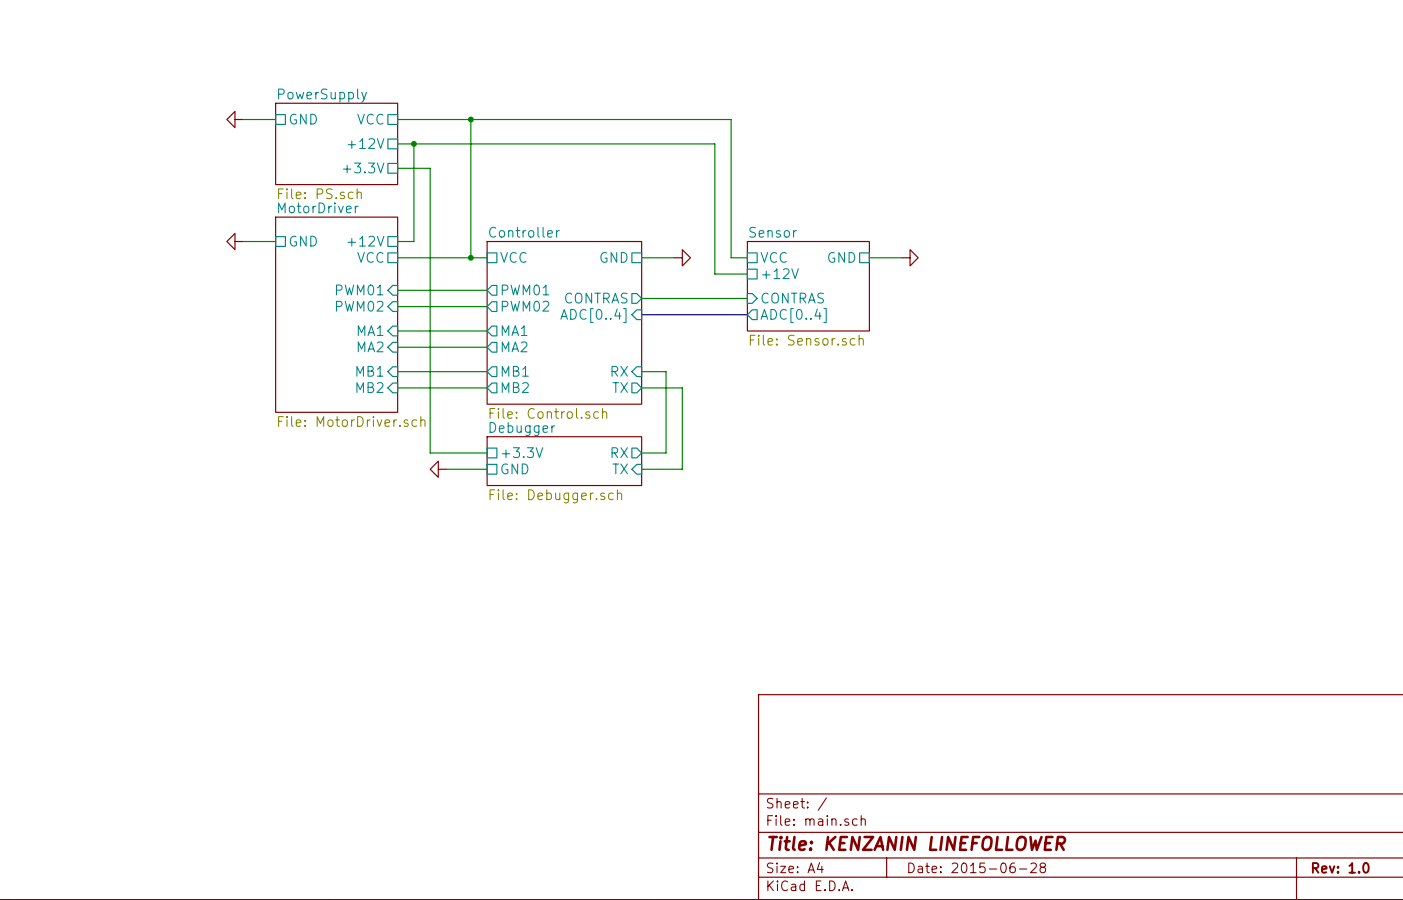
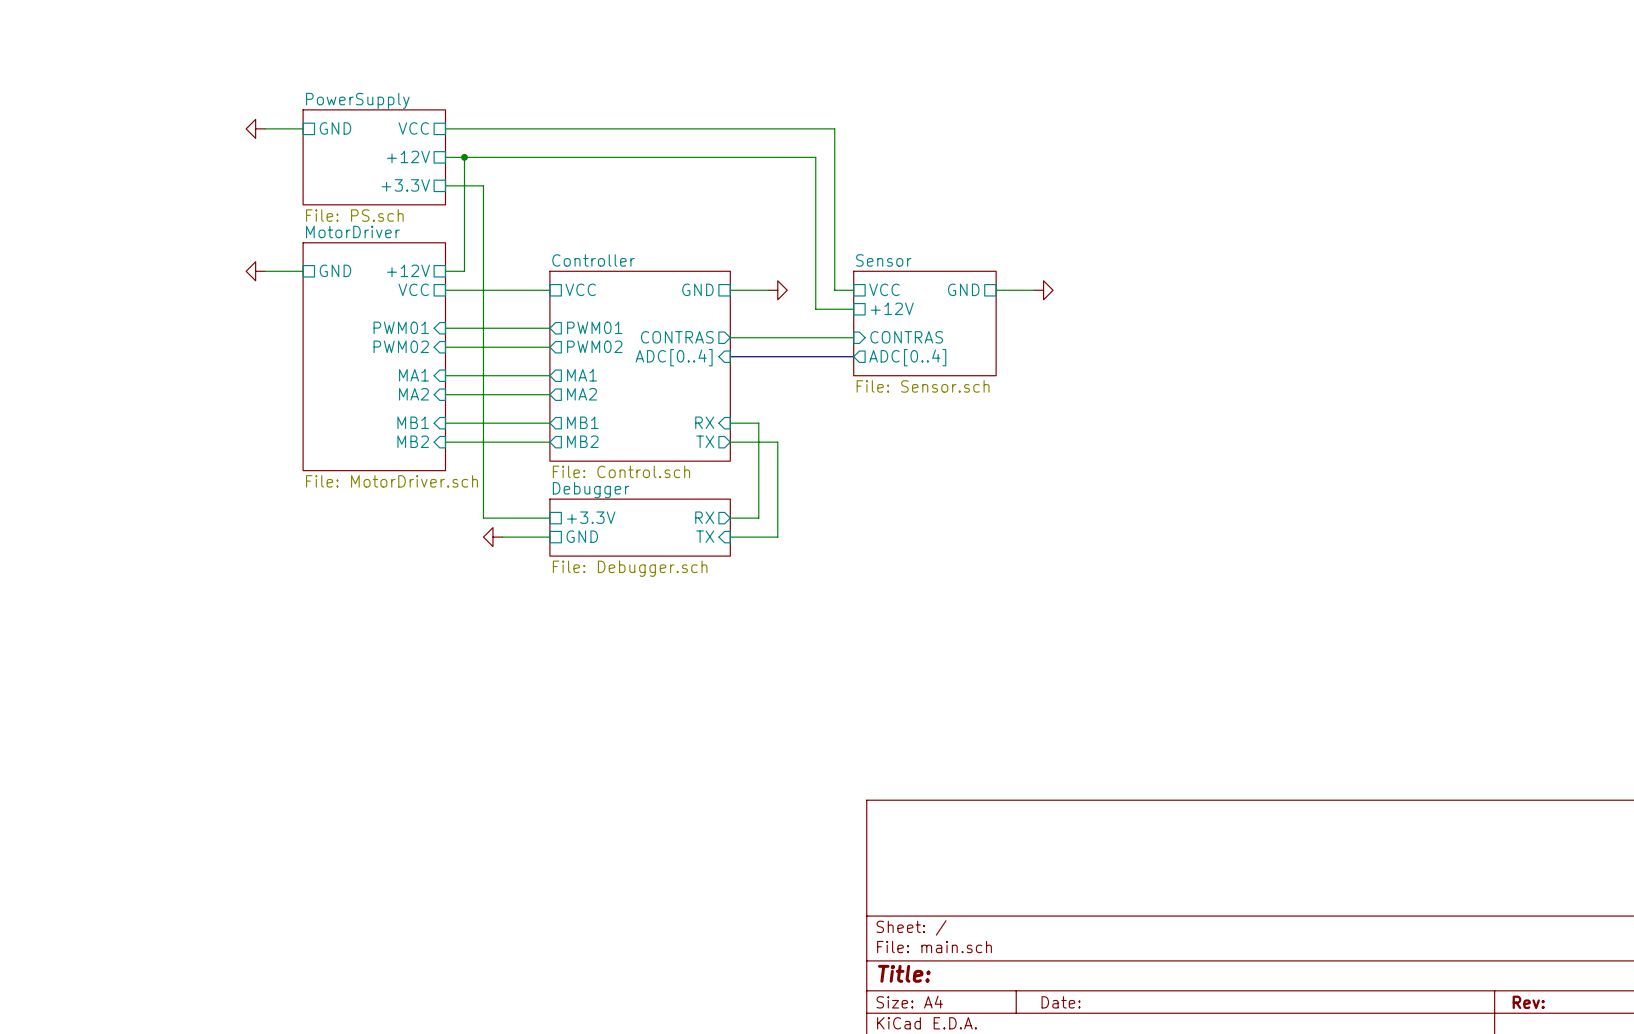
wire: (470, 119) (470, 257) -> none
junction: (470, 119) -> none
junction: (470, 257) -> none
title block: Title: KENZANIN LINEFOLLOWER (917, 843) -> Title: (904, 973)
title block: Date: 2015-06-28 (977, 867) -> Date: (1061, 1002)
title block: Rev: 1.0 (1340, 867) -> Rev: (1528, 1002)

